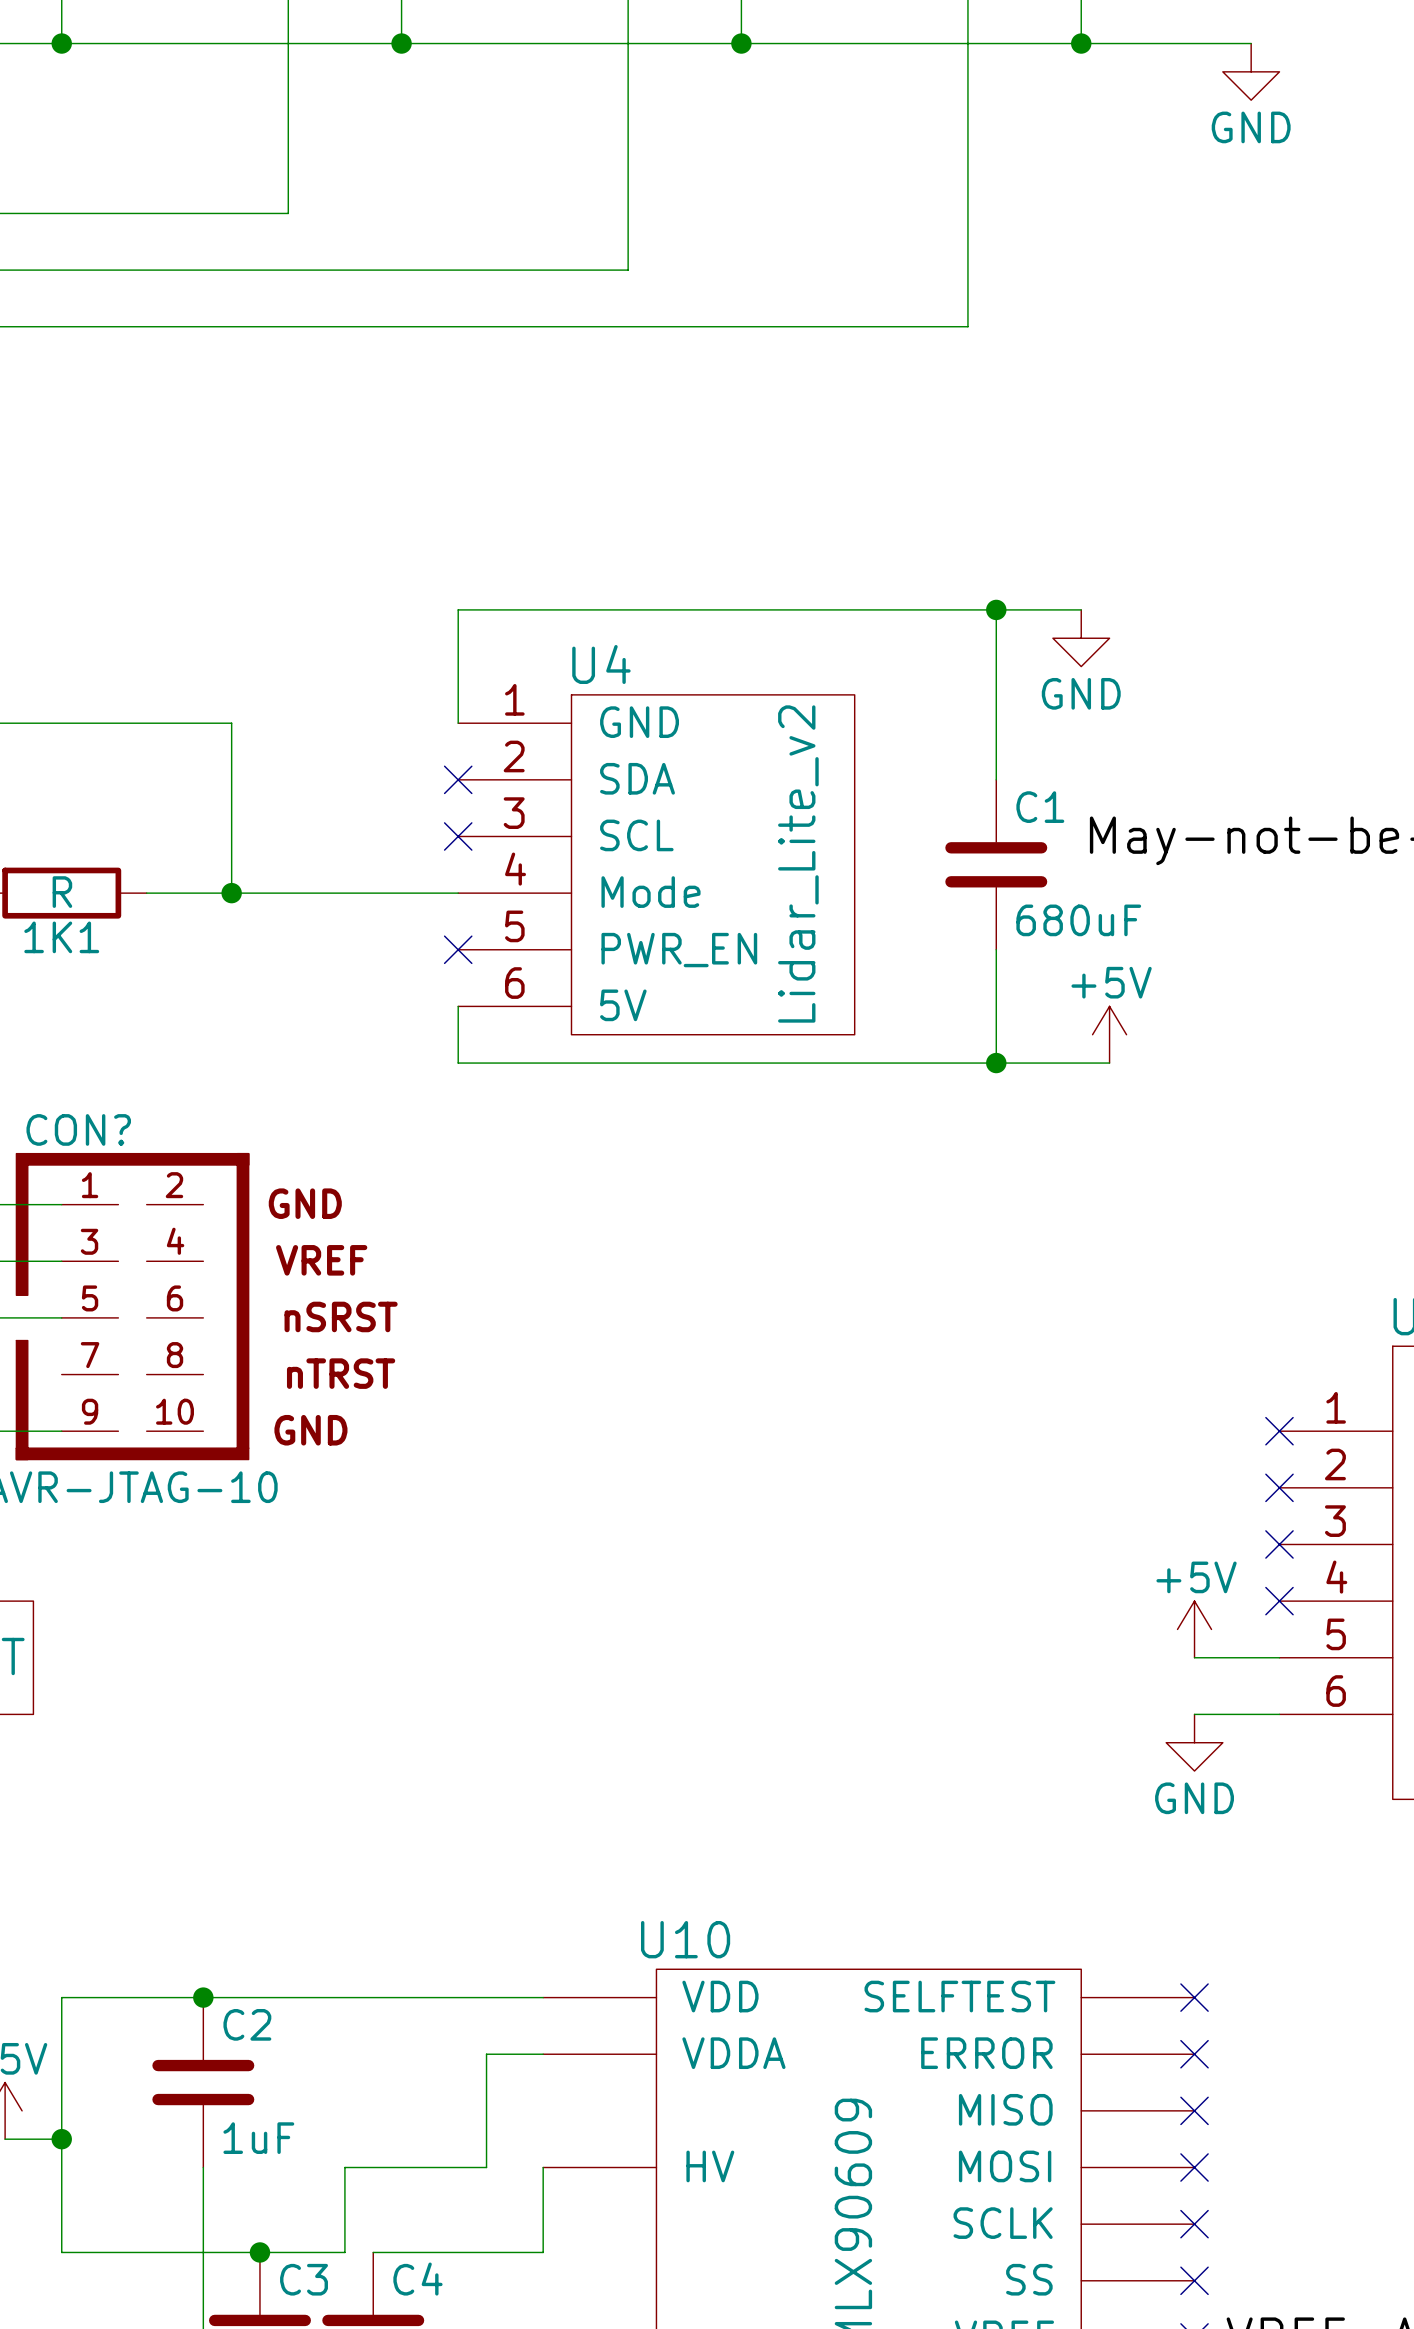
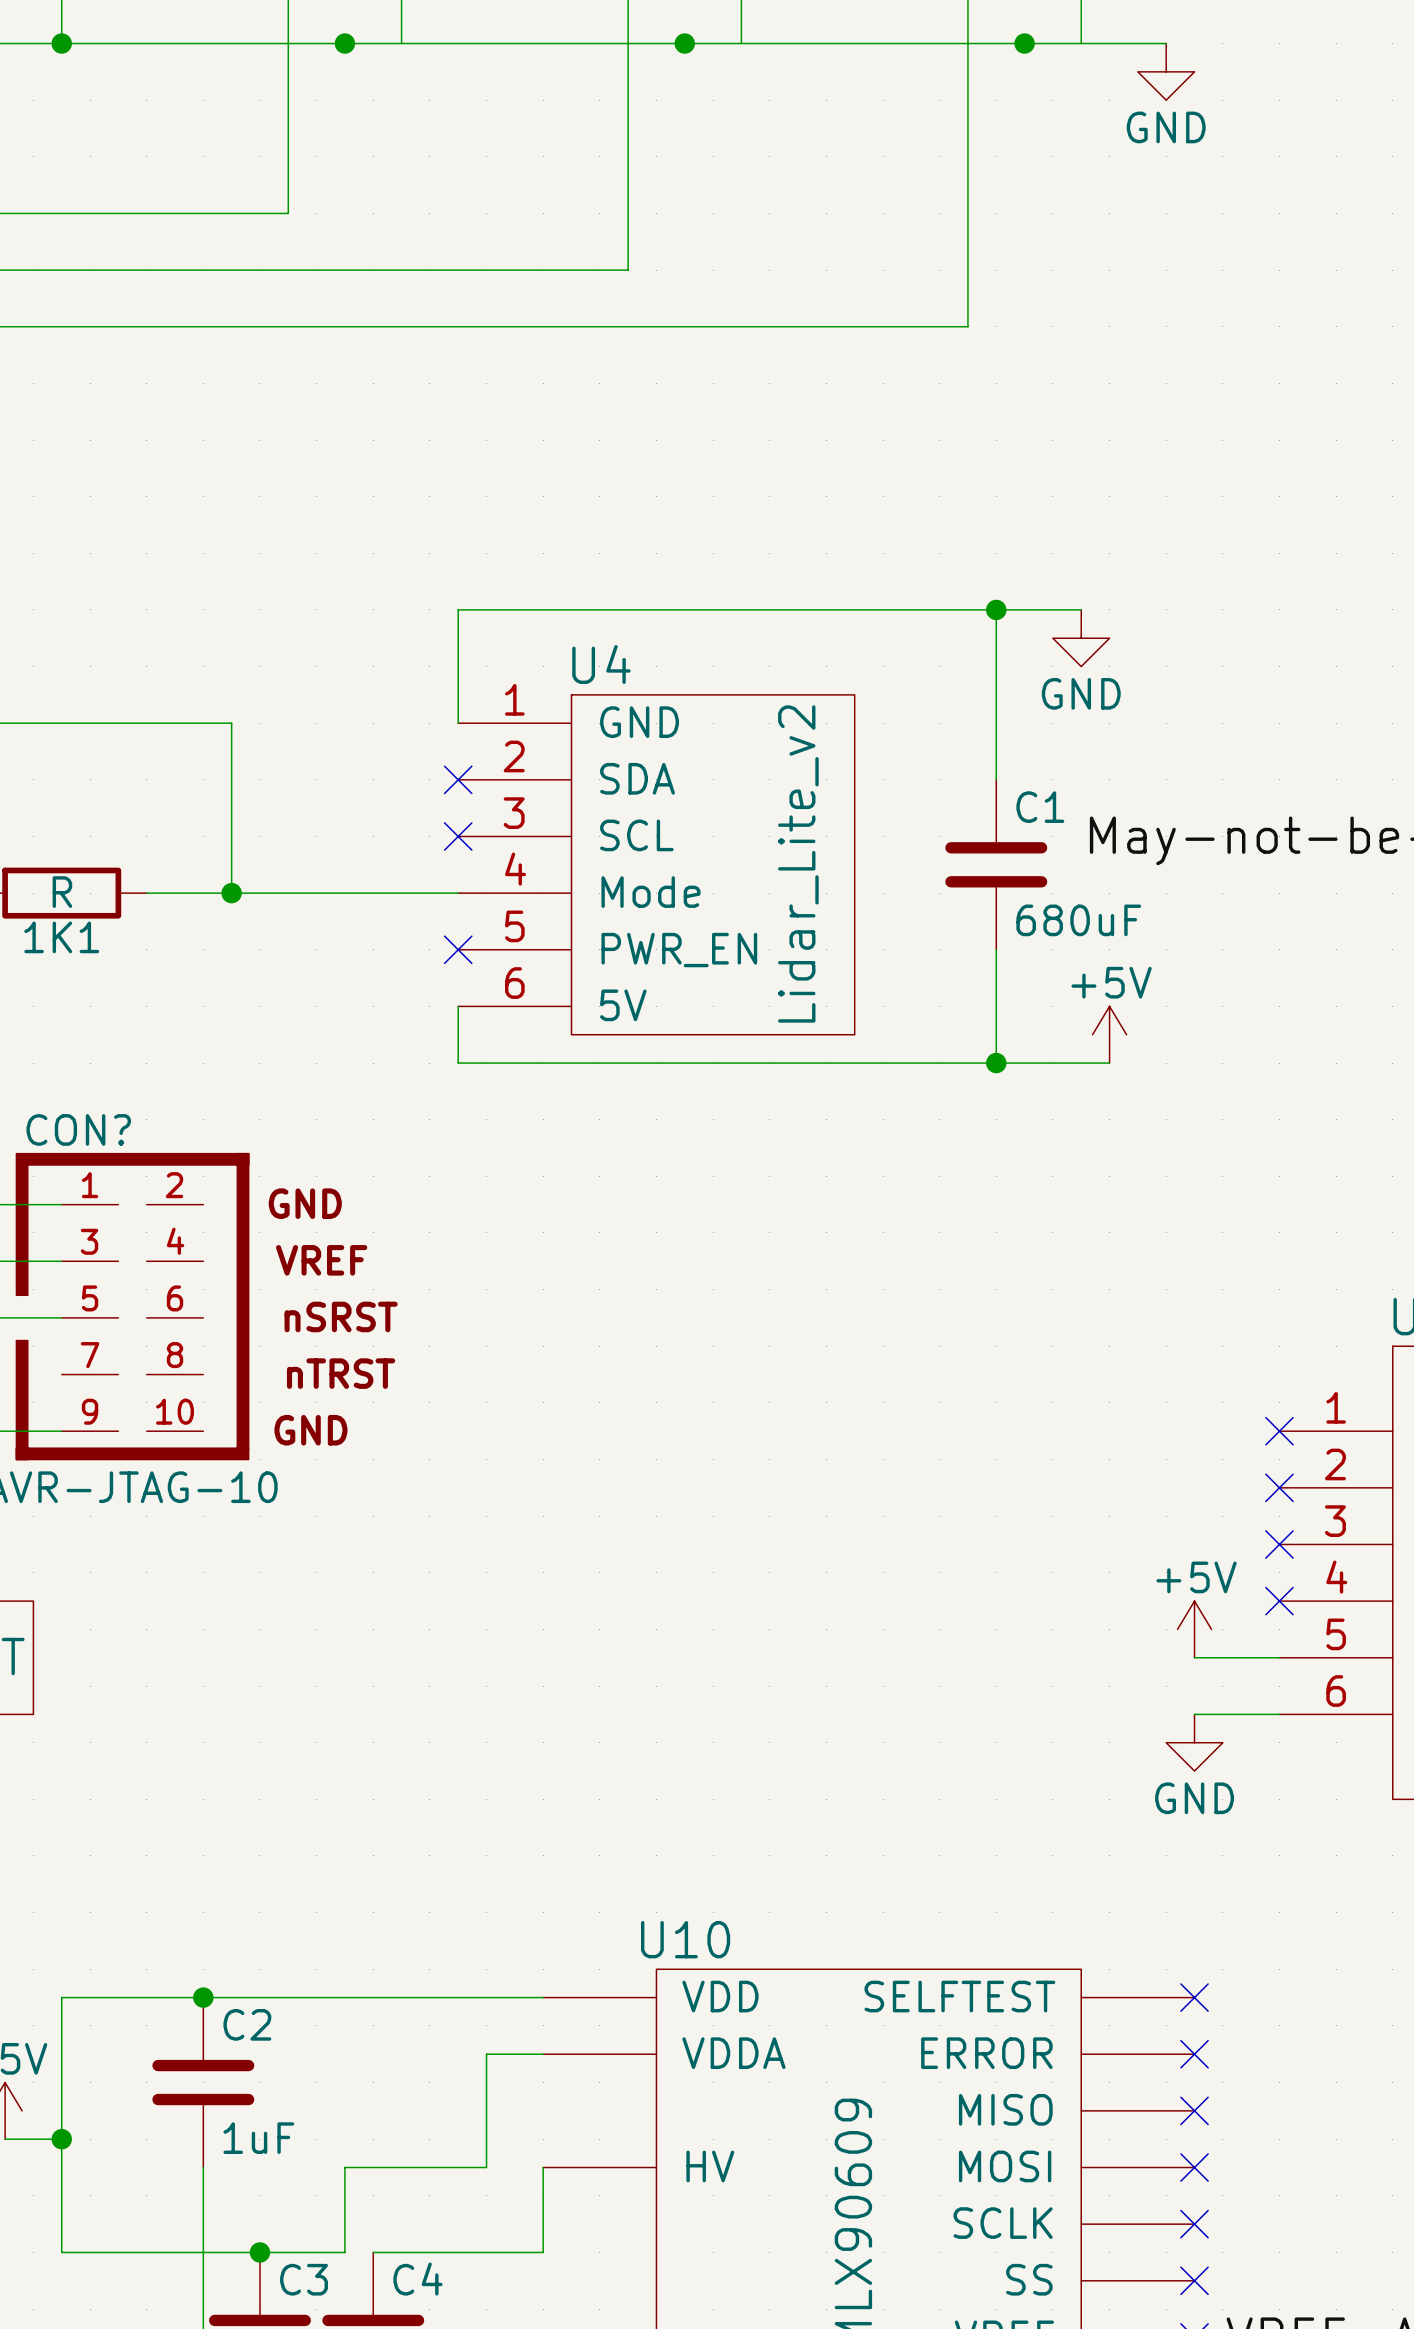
junction: none -> (344, 43)
junction: (401, 43) -> none
junction: none -> (684, 43)
junction: (741, 43) -> none
junction: none -> (1024, 43)
junction: (1081, 43) -> none
wire: (1166, 43) (1251, 43) -> none
power symbol position: GND (1251, 71) -> GND (1166, 71)

